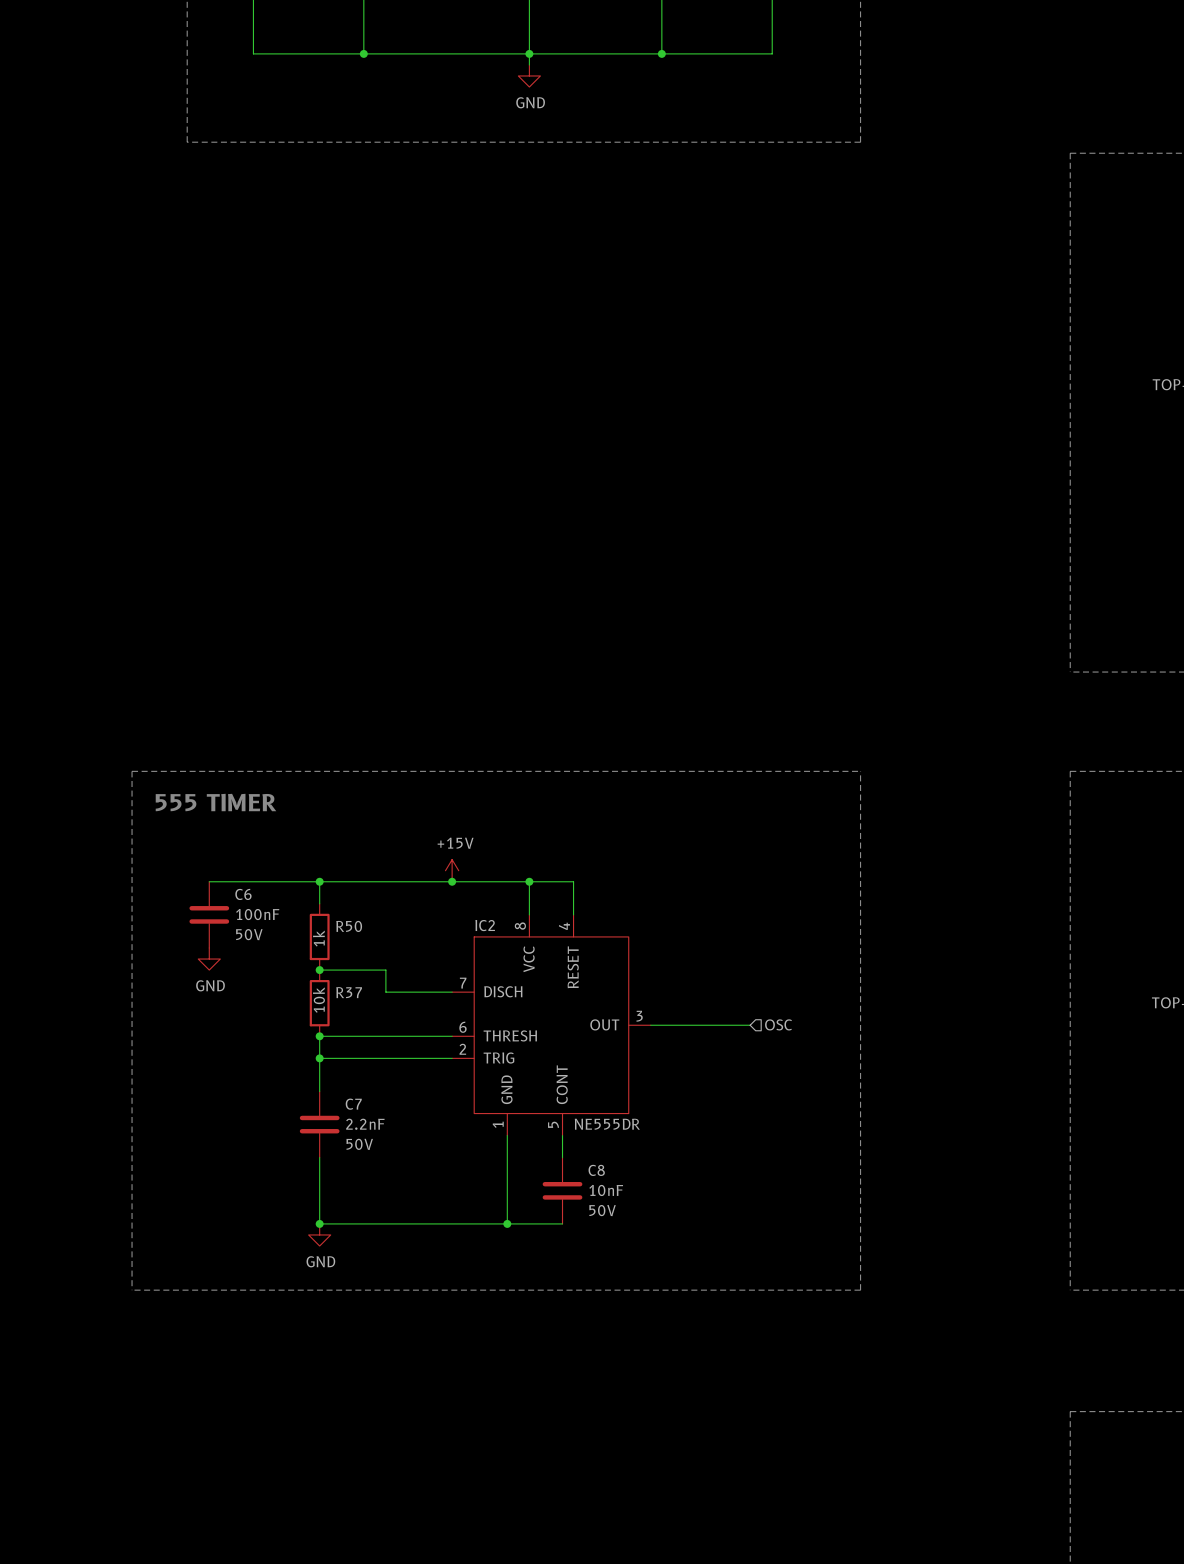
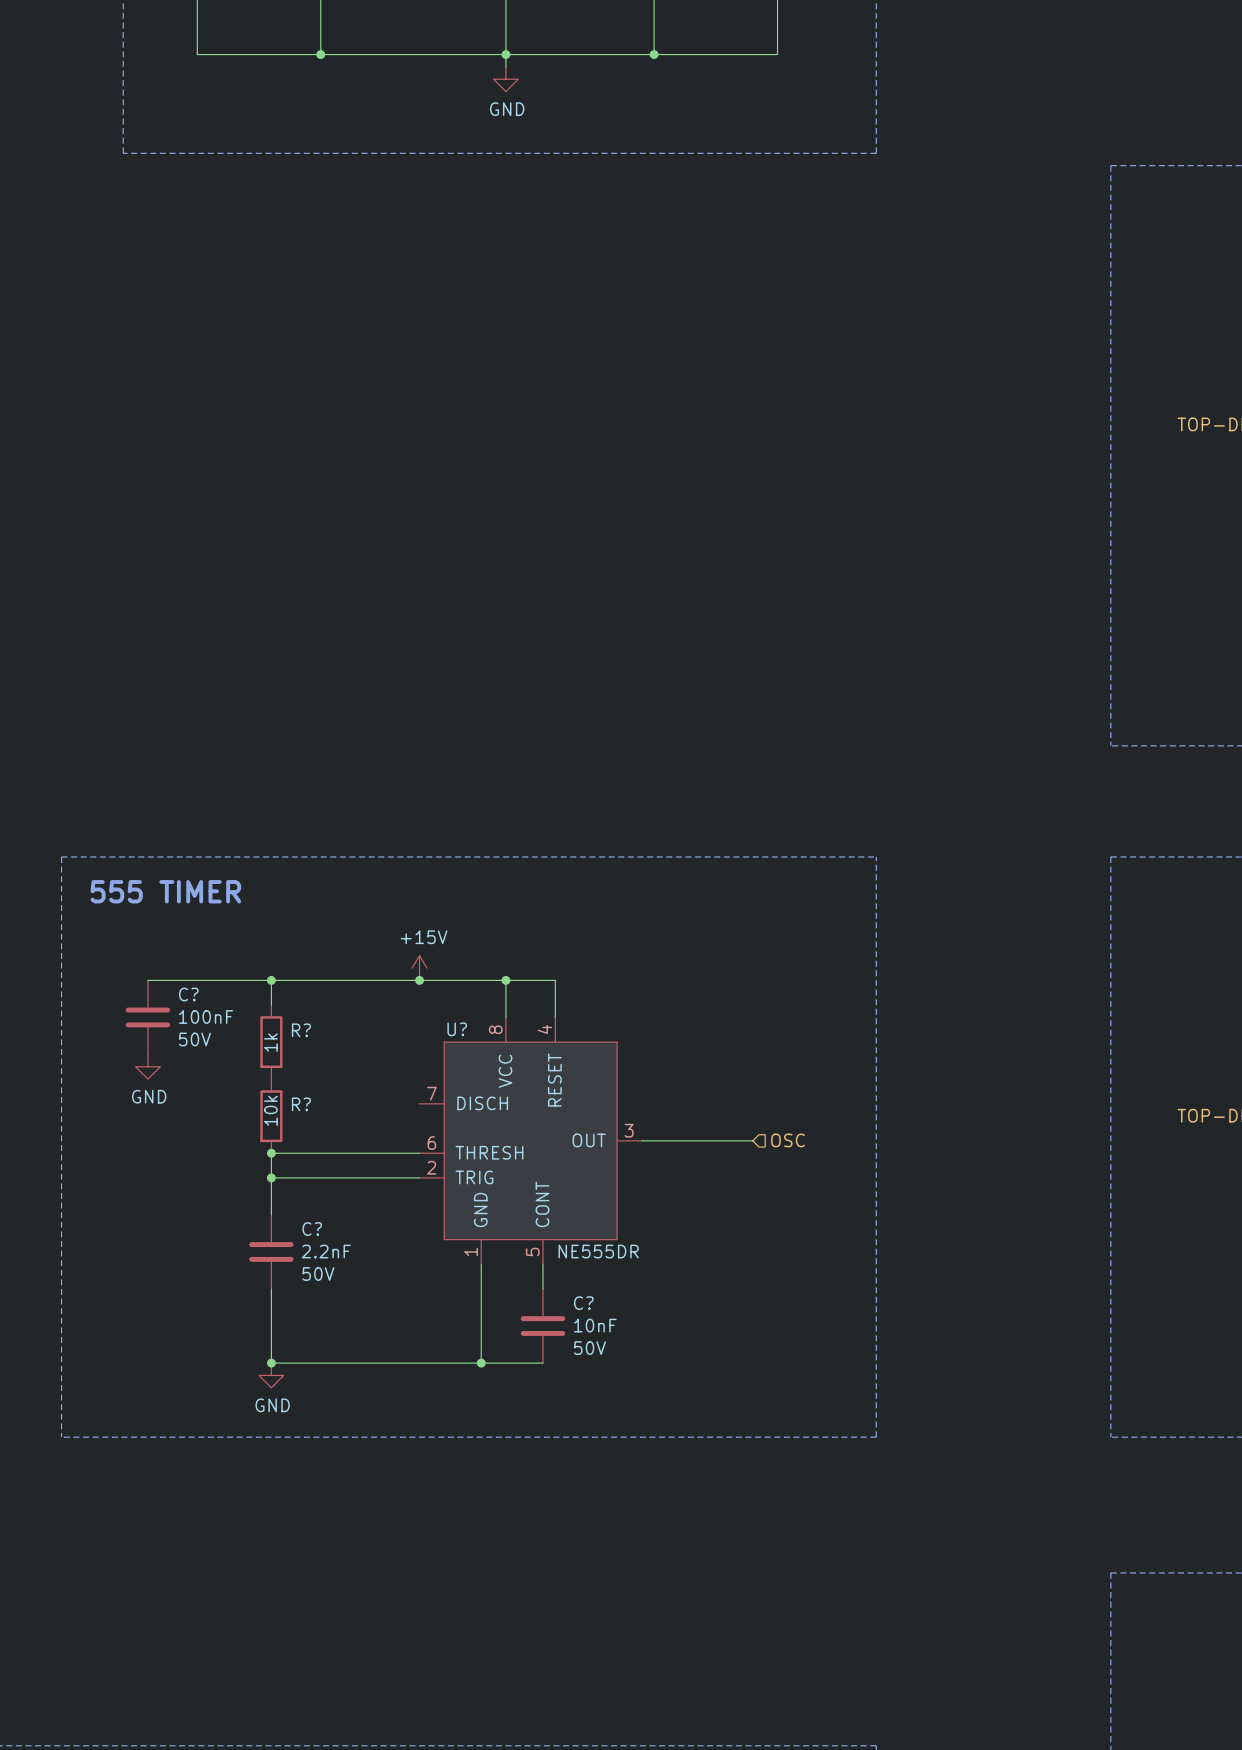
C6 name: C6 (243, 894) -> C? (188, 994)
IC2 name: IC2 (485, 925) -> U? (457, 1029)
R50 name: R50 (349, 926) -> R? (301, 1030)
wire: (319, 970) (385, 970) (385, 992) (452, 992) -> none
junction: (319, 970) -> none
R37 name: R37 (349, 992) -> R? (301, 1104)
C7 name: C7 (353, 1104) -> C? (312, 1229)
C8 name: C8 (596, 1170) -> C? (583, 1303)

